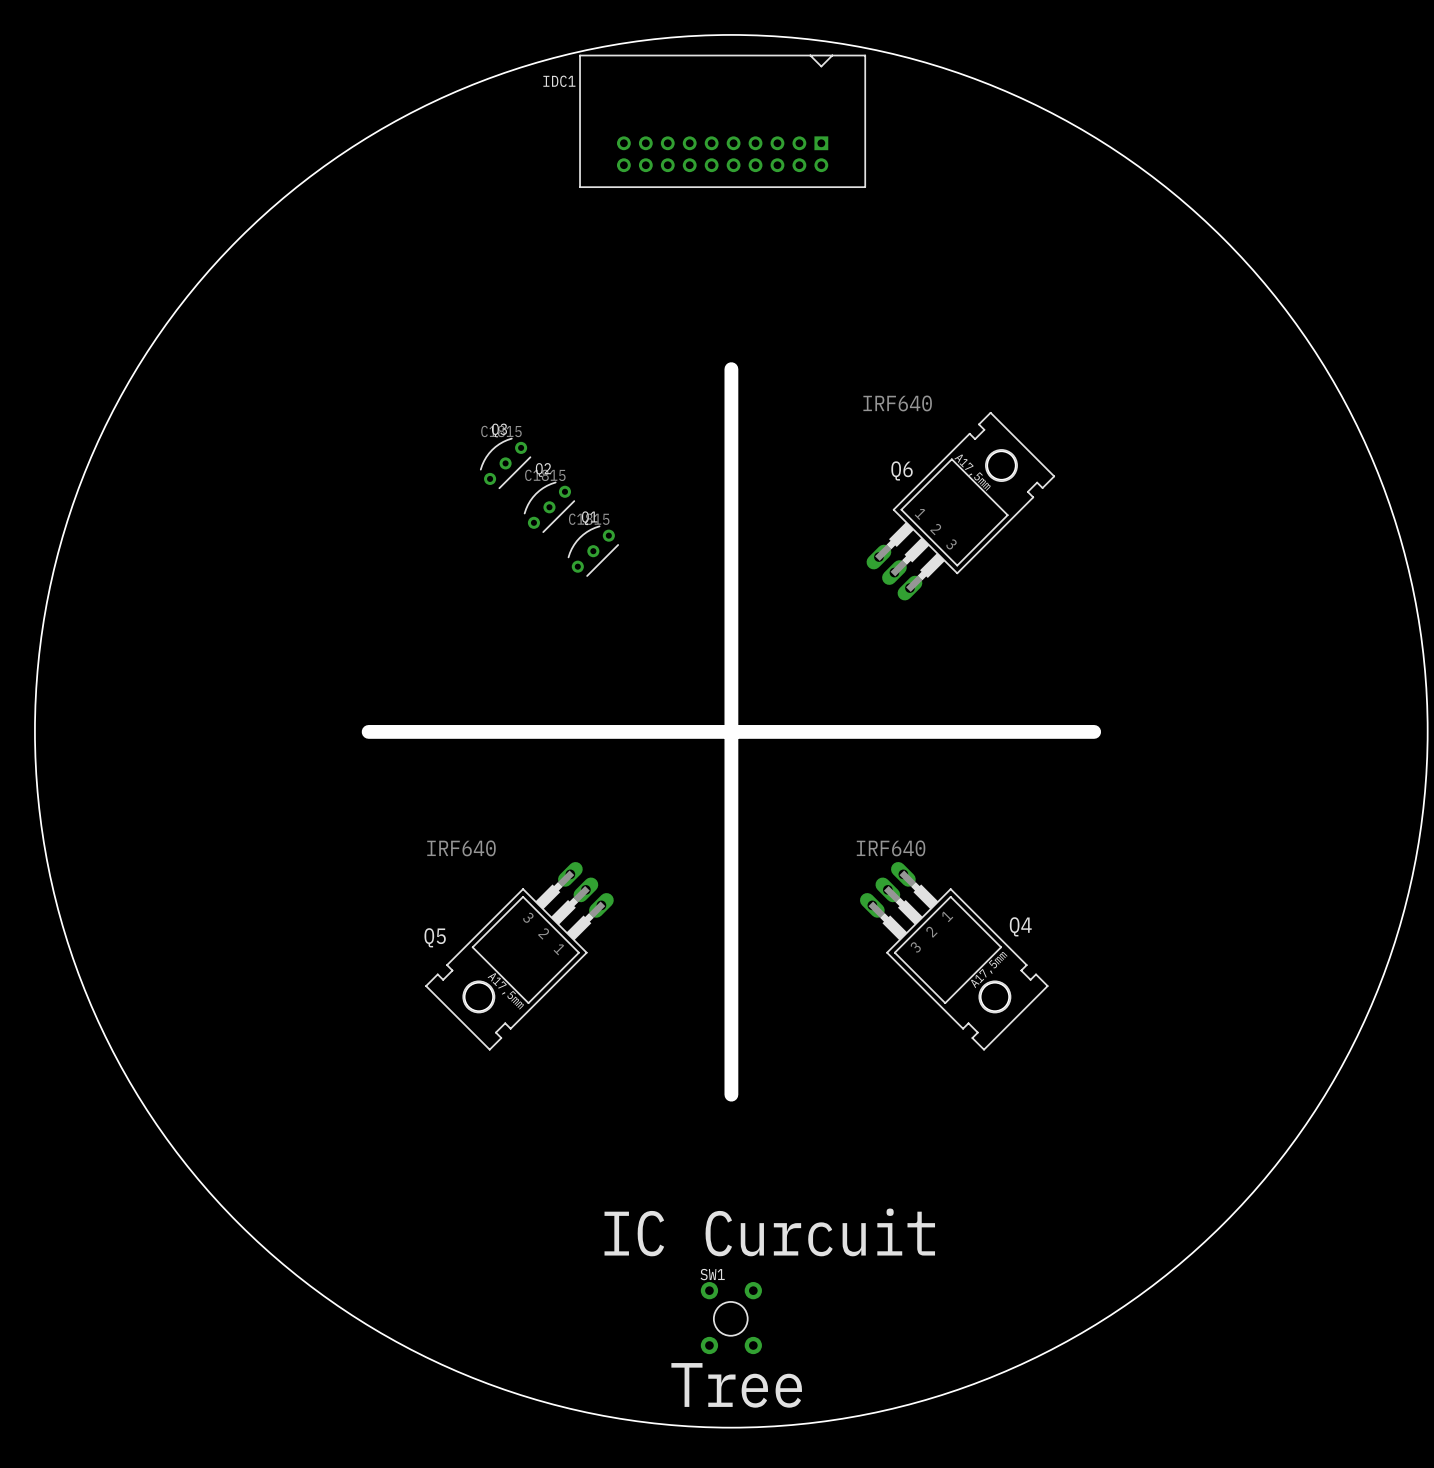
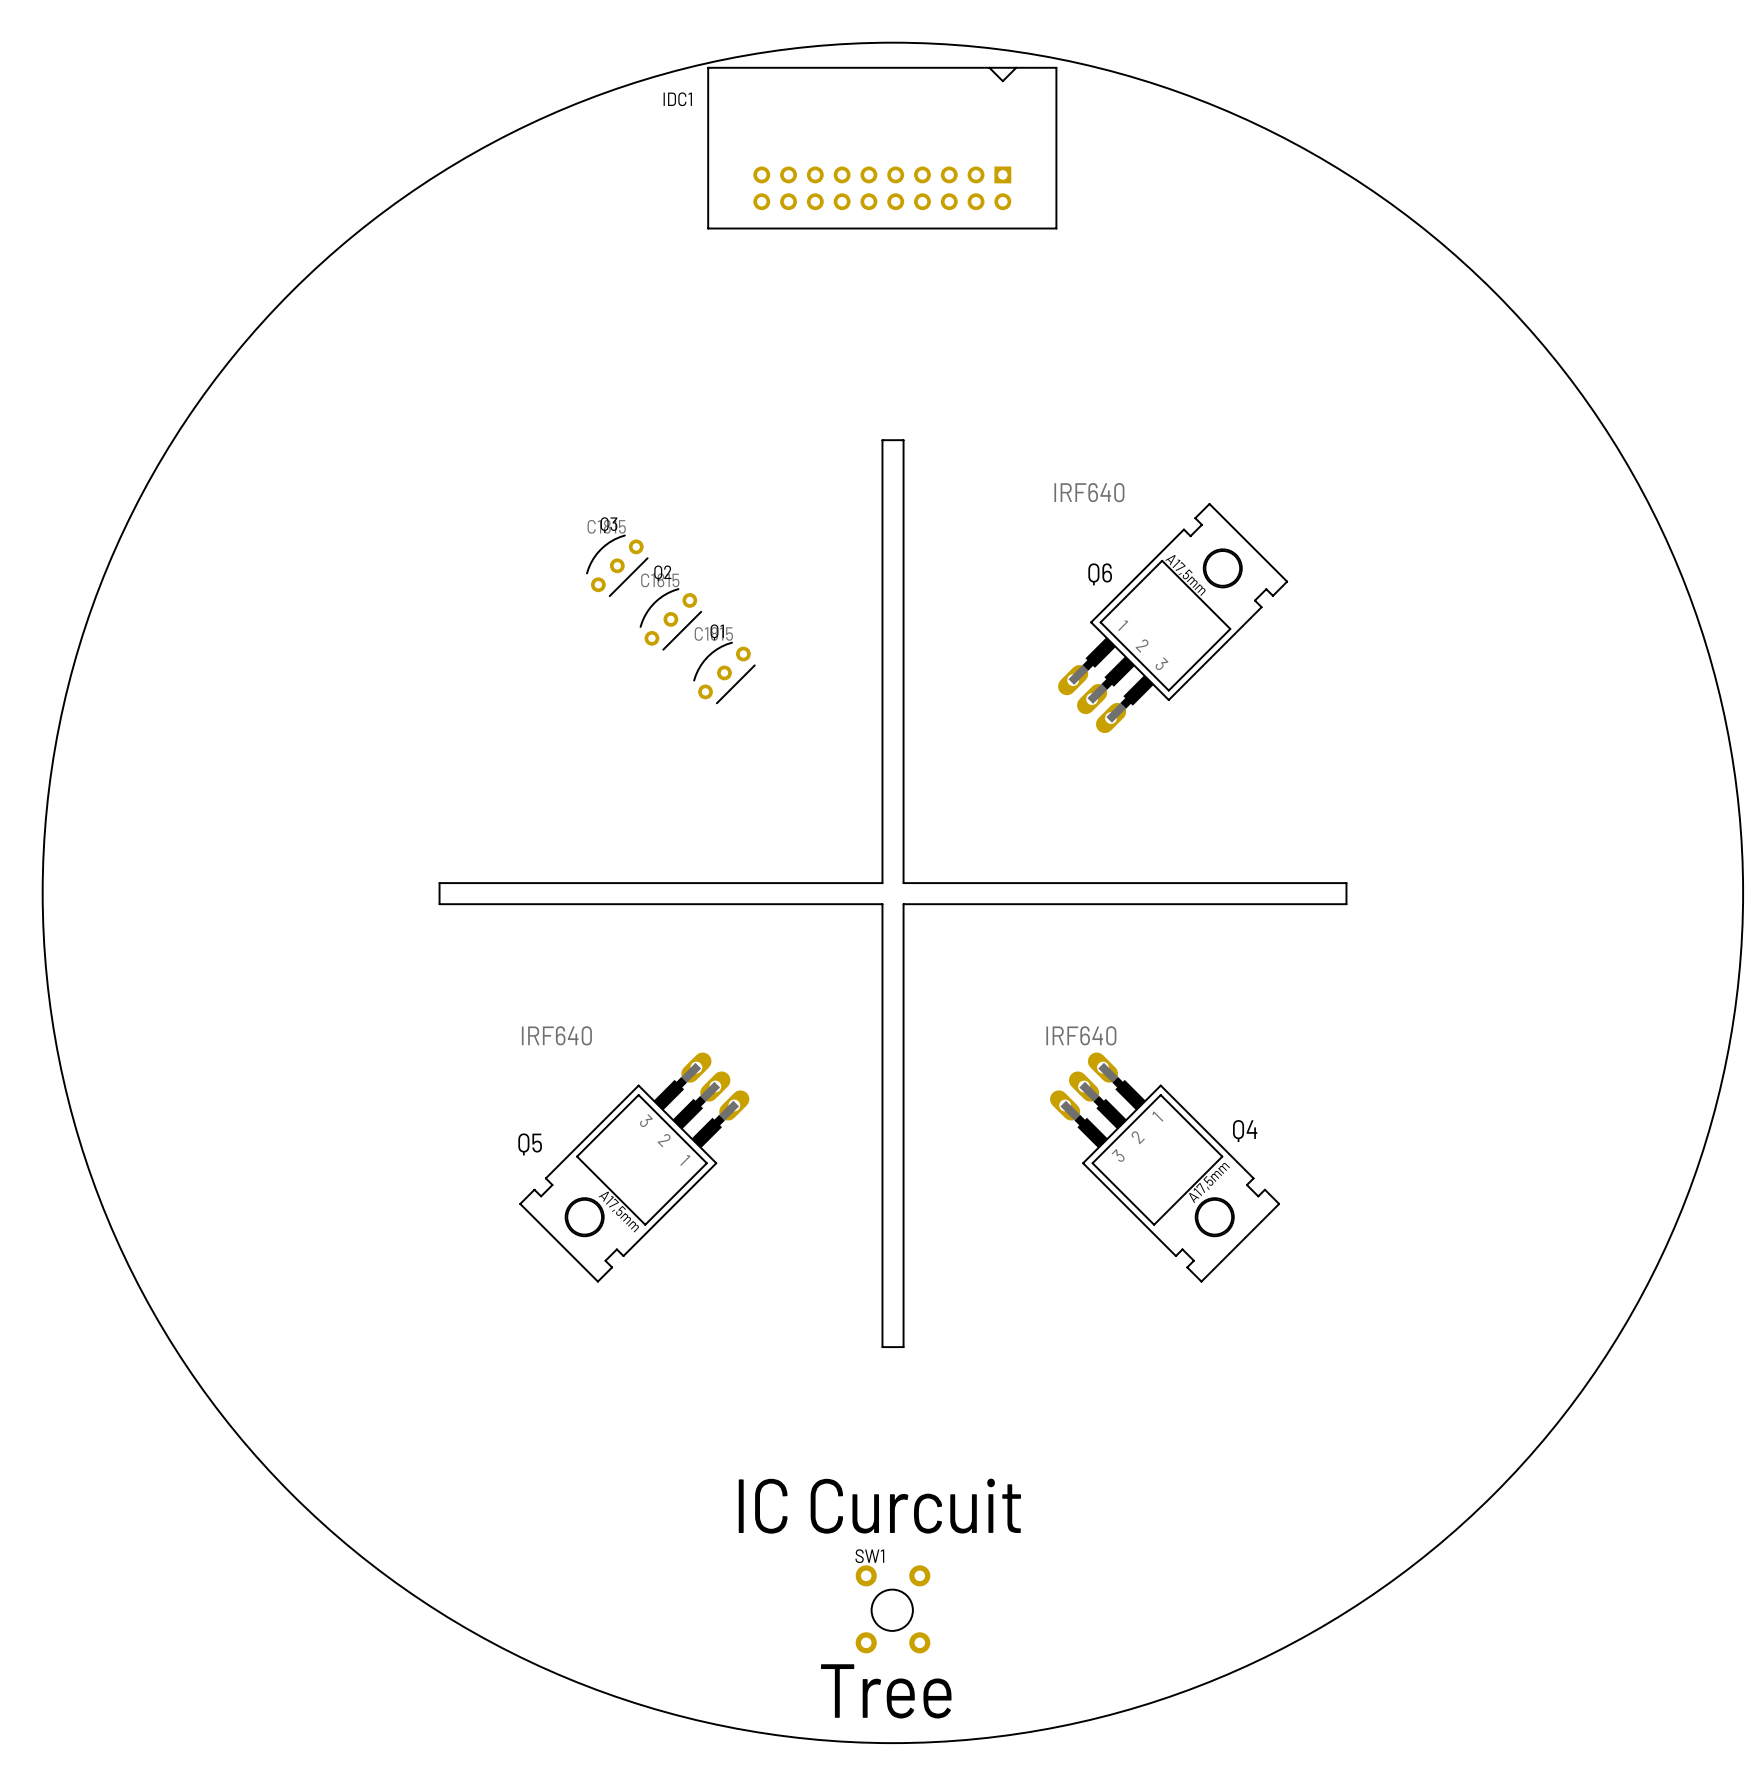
part footprint: [361, 362, 1102, 1102] -> [438, 439, 1348, 1348]

